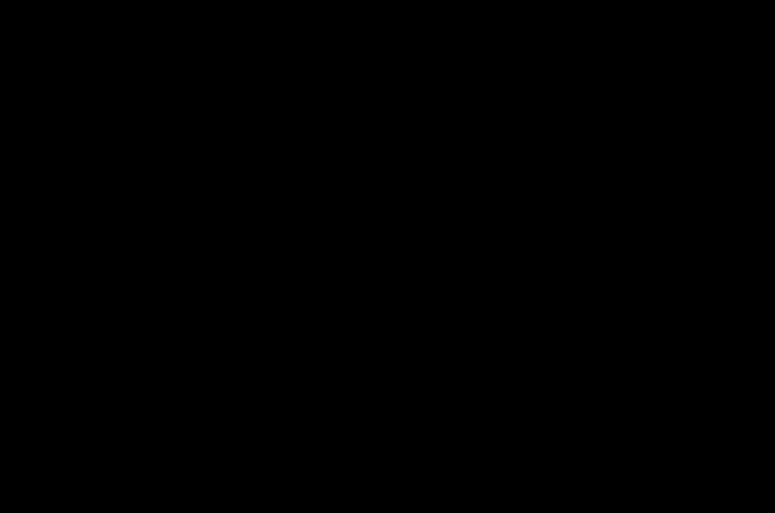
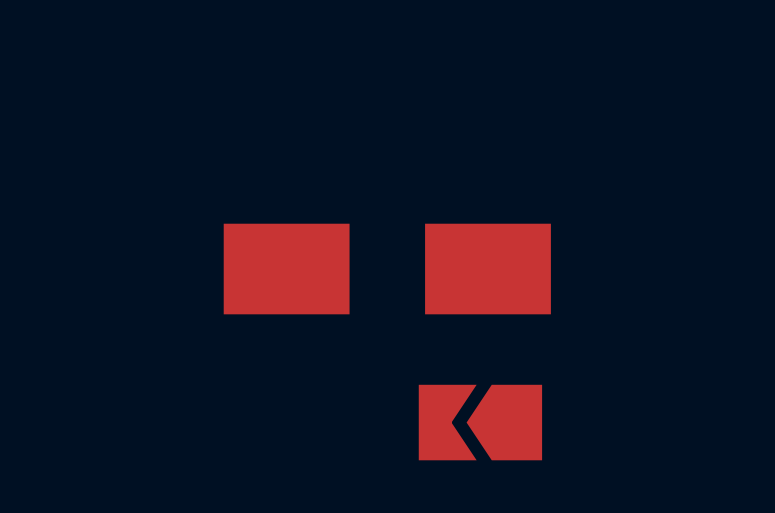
part: none -> (387, 269)
part: none -> (480, 422)

